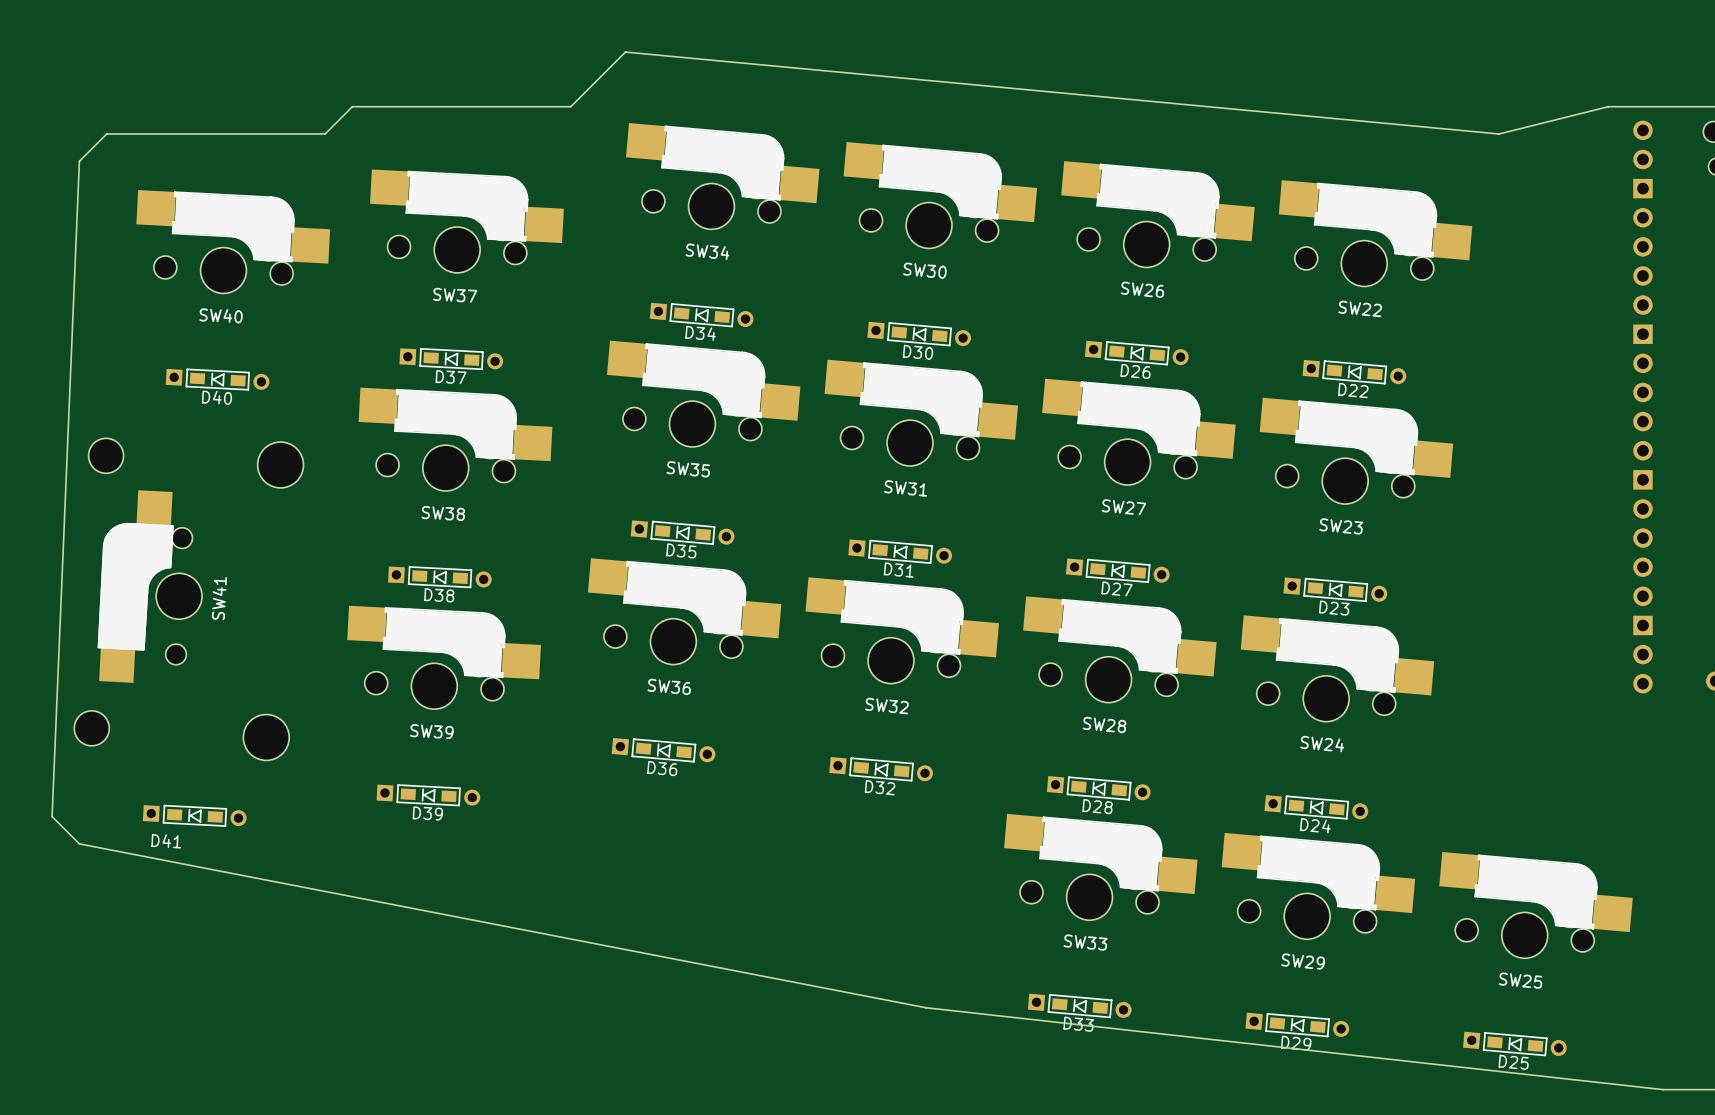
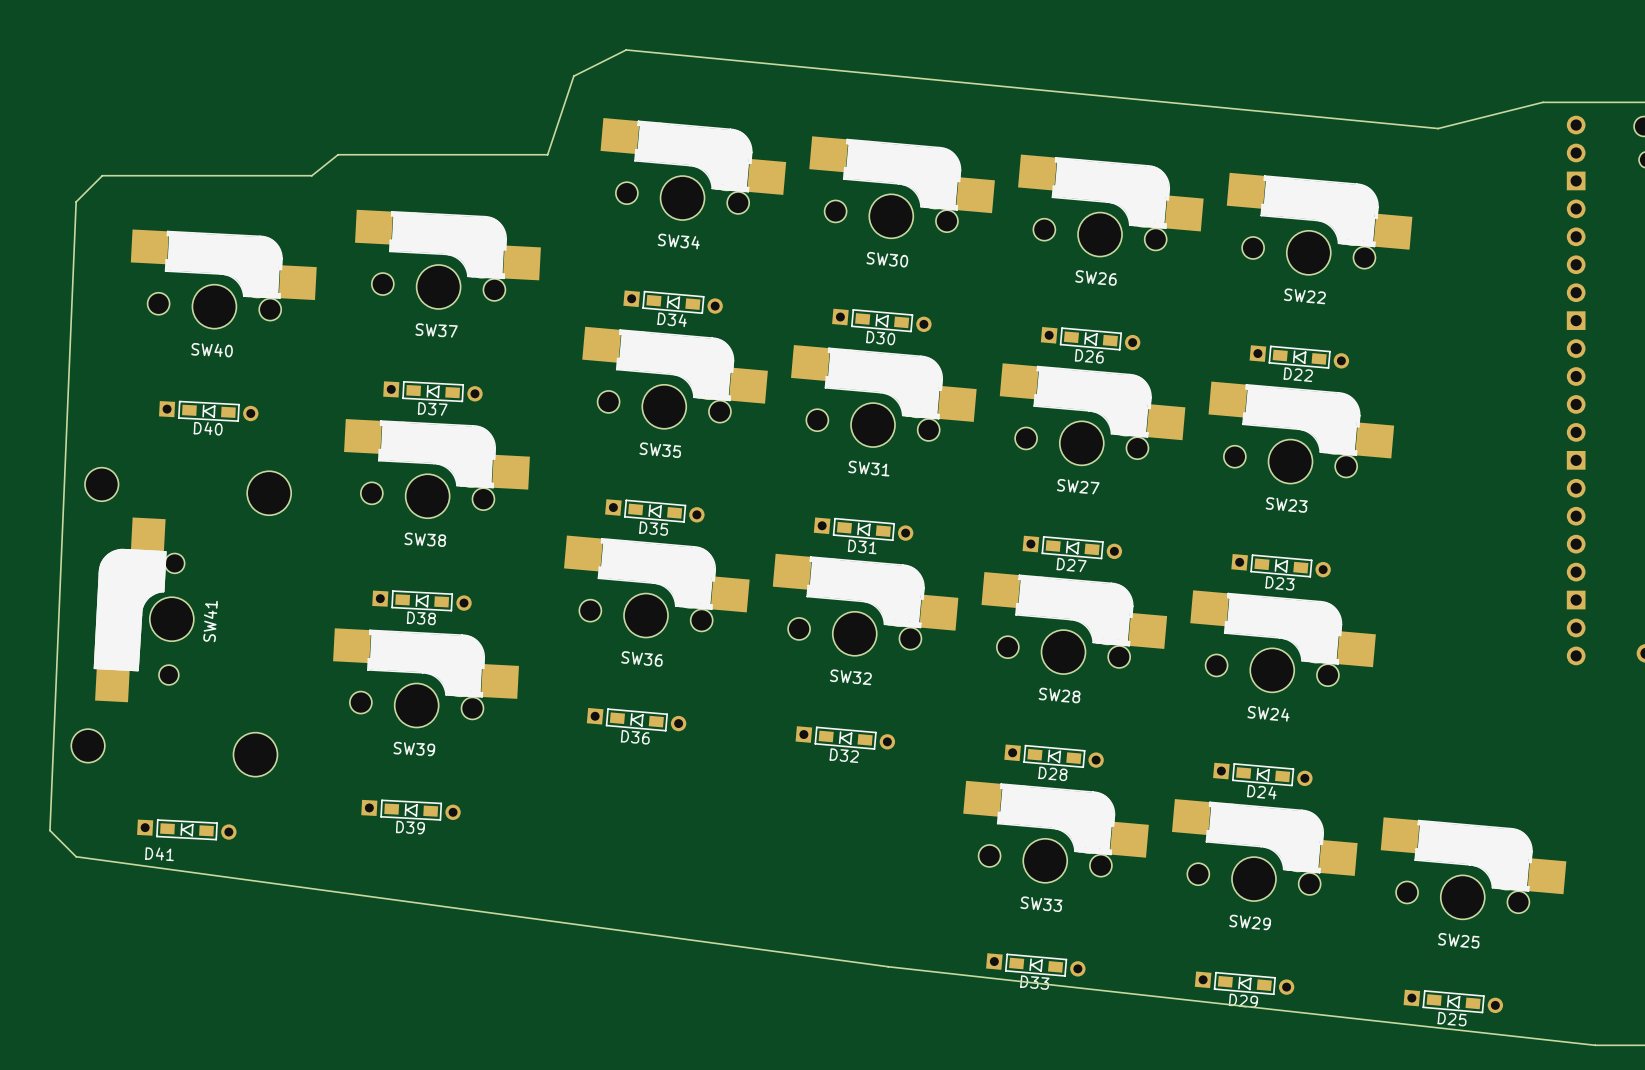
board edge: (1499, 134) (625, 52) (570, 106) (352, 106) (325, 134) (106, 134) (79, 161) (52, 816) (79, 843) (925, 1007) -> (1438, 128) (626, 49) (573, 76) (547, 154) (338, 154) (311, 175) (102, 175) (76, 201) (49, 830) (76, 856) (888, 966)
SW37 position: (466, 221) -> (447, 259)
SW40 position: (233, 241) -> (223, 279)
D37 position: (451, 359) -> (432, 391)
D40 position: (217, 379) -> (208, 411)
SW38 position: (455, 439) -> (437, 468)
D38 position: (439, 577) -> (421, 600)
SW41 position: (188, 599) -> (181, 622)
SW39 position: (444, 657) -> (426, 677)
D39 position: (428, 795) -> (411, 810)
D41 position: (194, 815) -> (186, 829)

